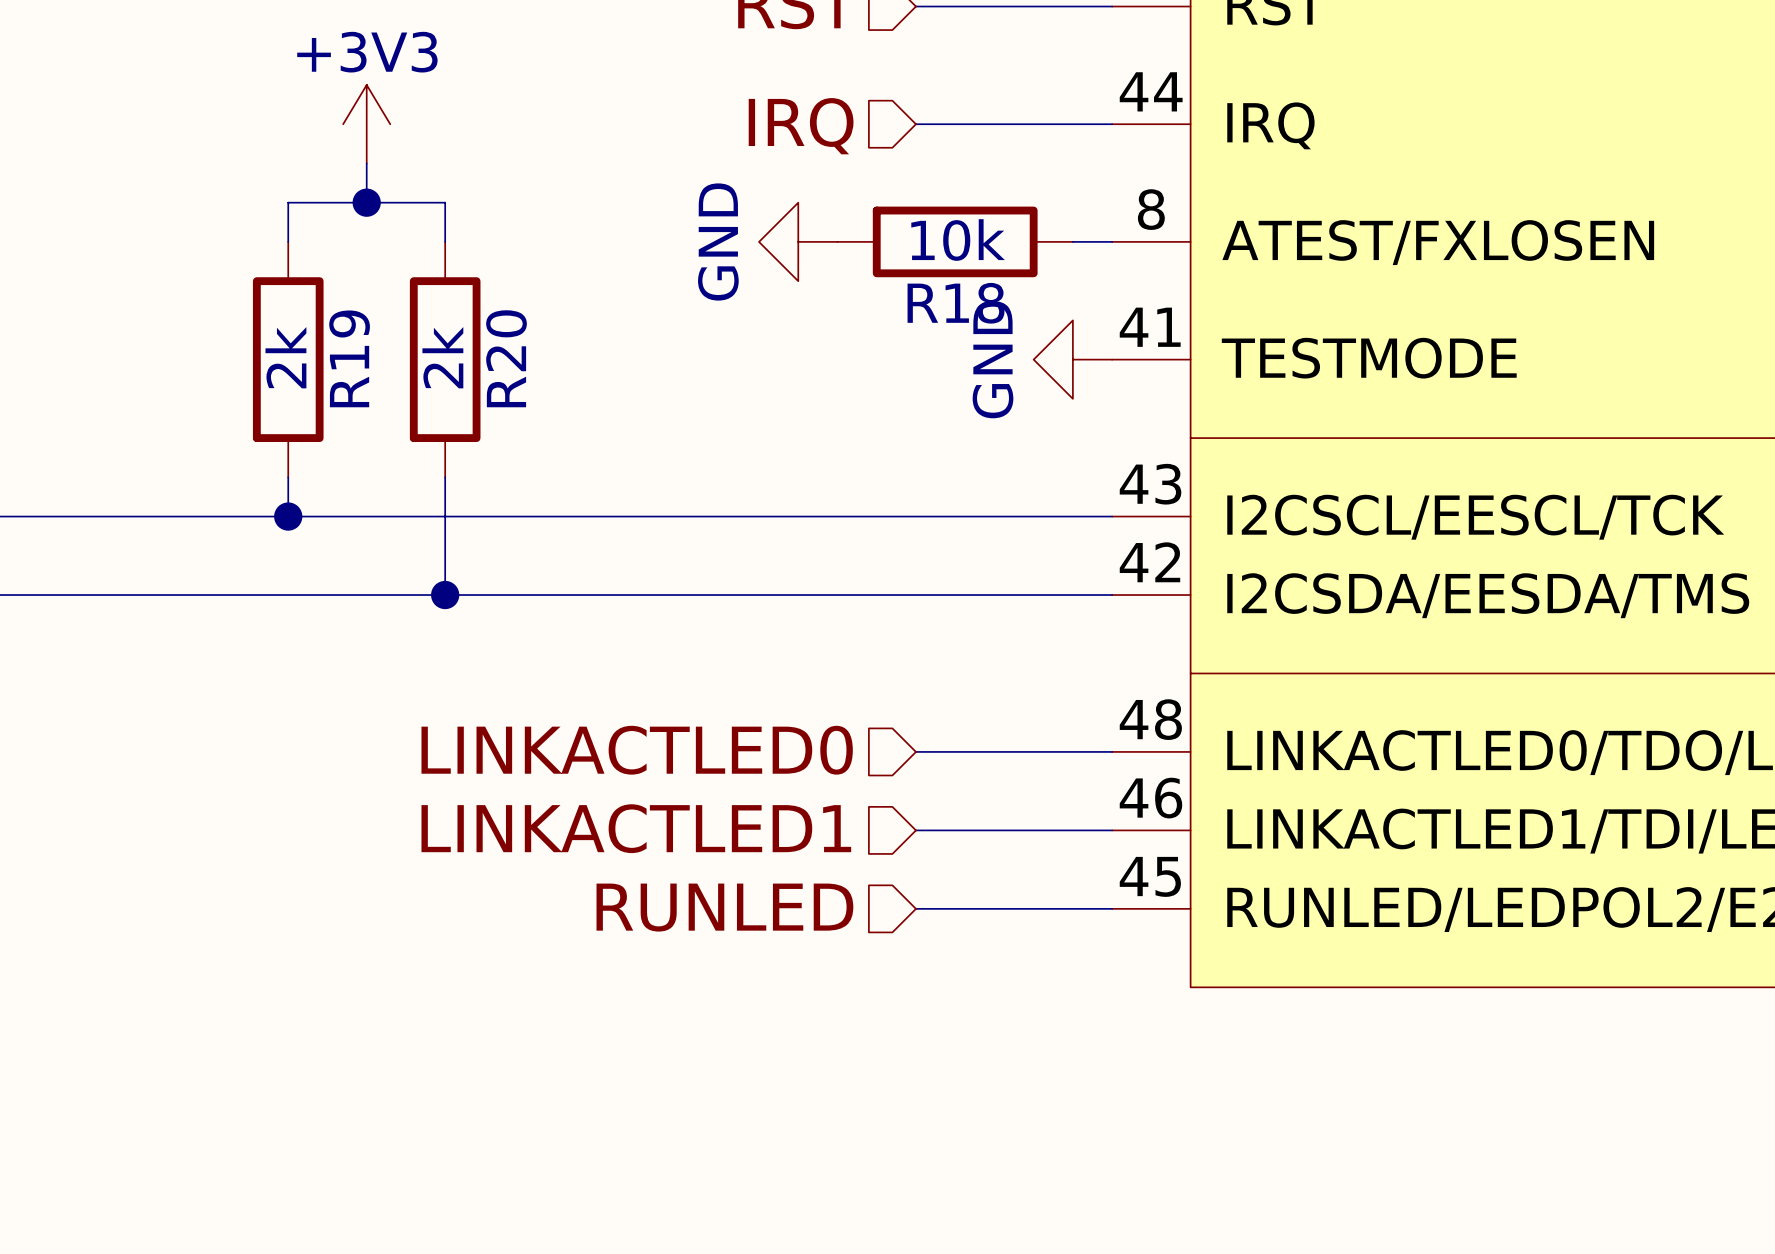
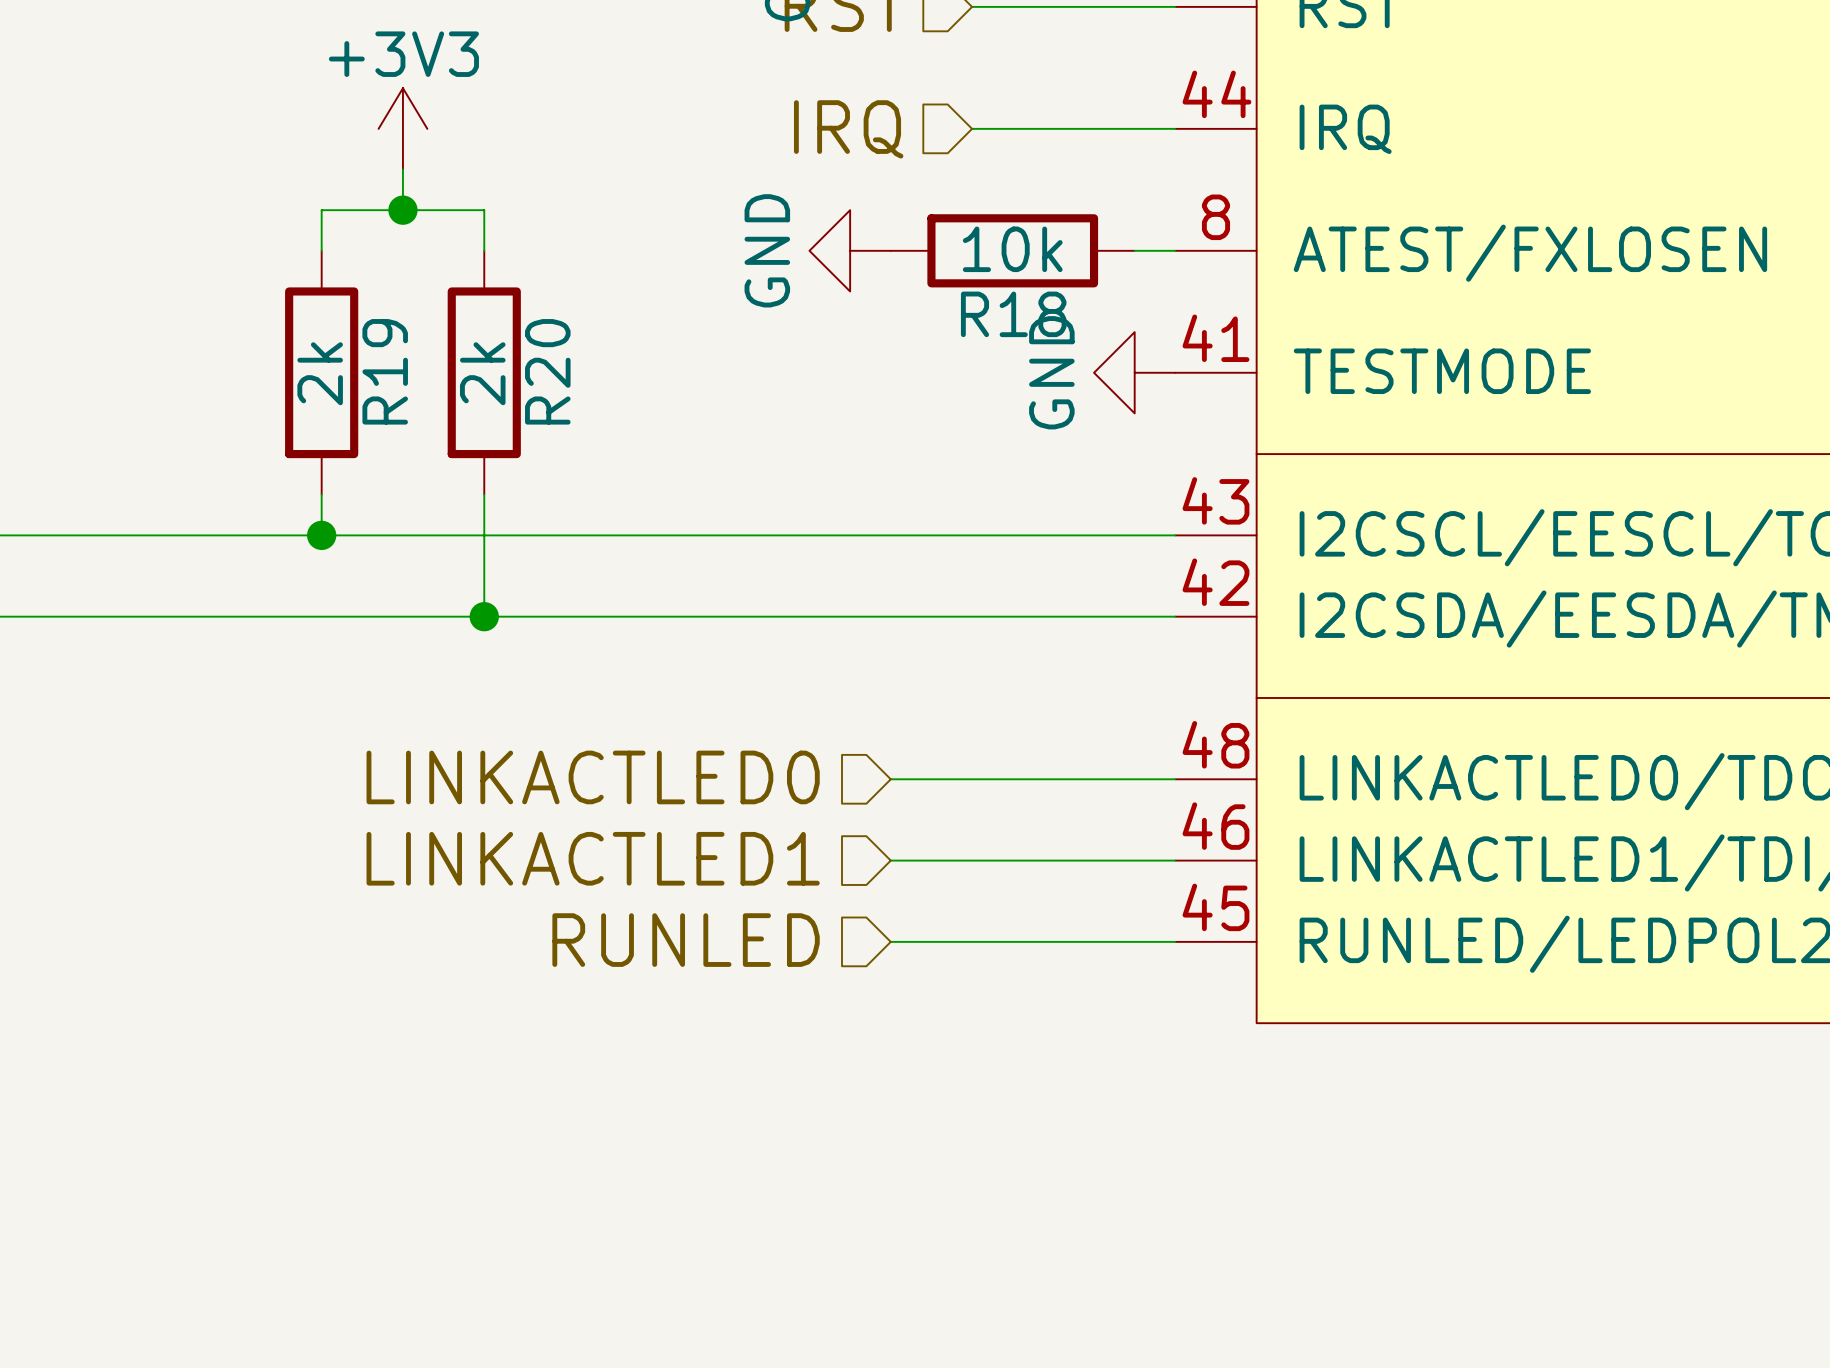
hierarchical label position: LINKACTLED0 (637, 750) -> LINKACTLED0 (593, 777)
wire: none -> (890, 779) (972, 779)
hierarchical label position: LINKACTLED1 (636, 828) -> LINKACTLED1 (593, 858)
wire: none -> (890, 860) (972, 860)
hierarchical label position: RUNLED (724, 907) -> RUNLED (686, 940)
wire: none -> (890, 941) (972, 941)

